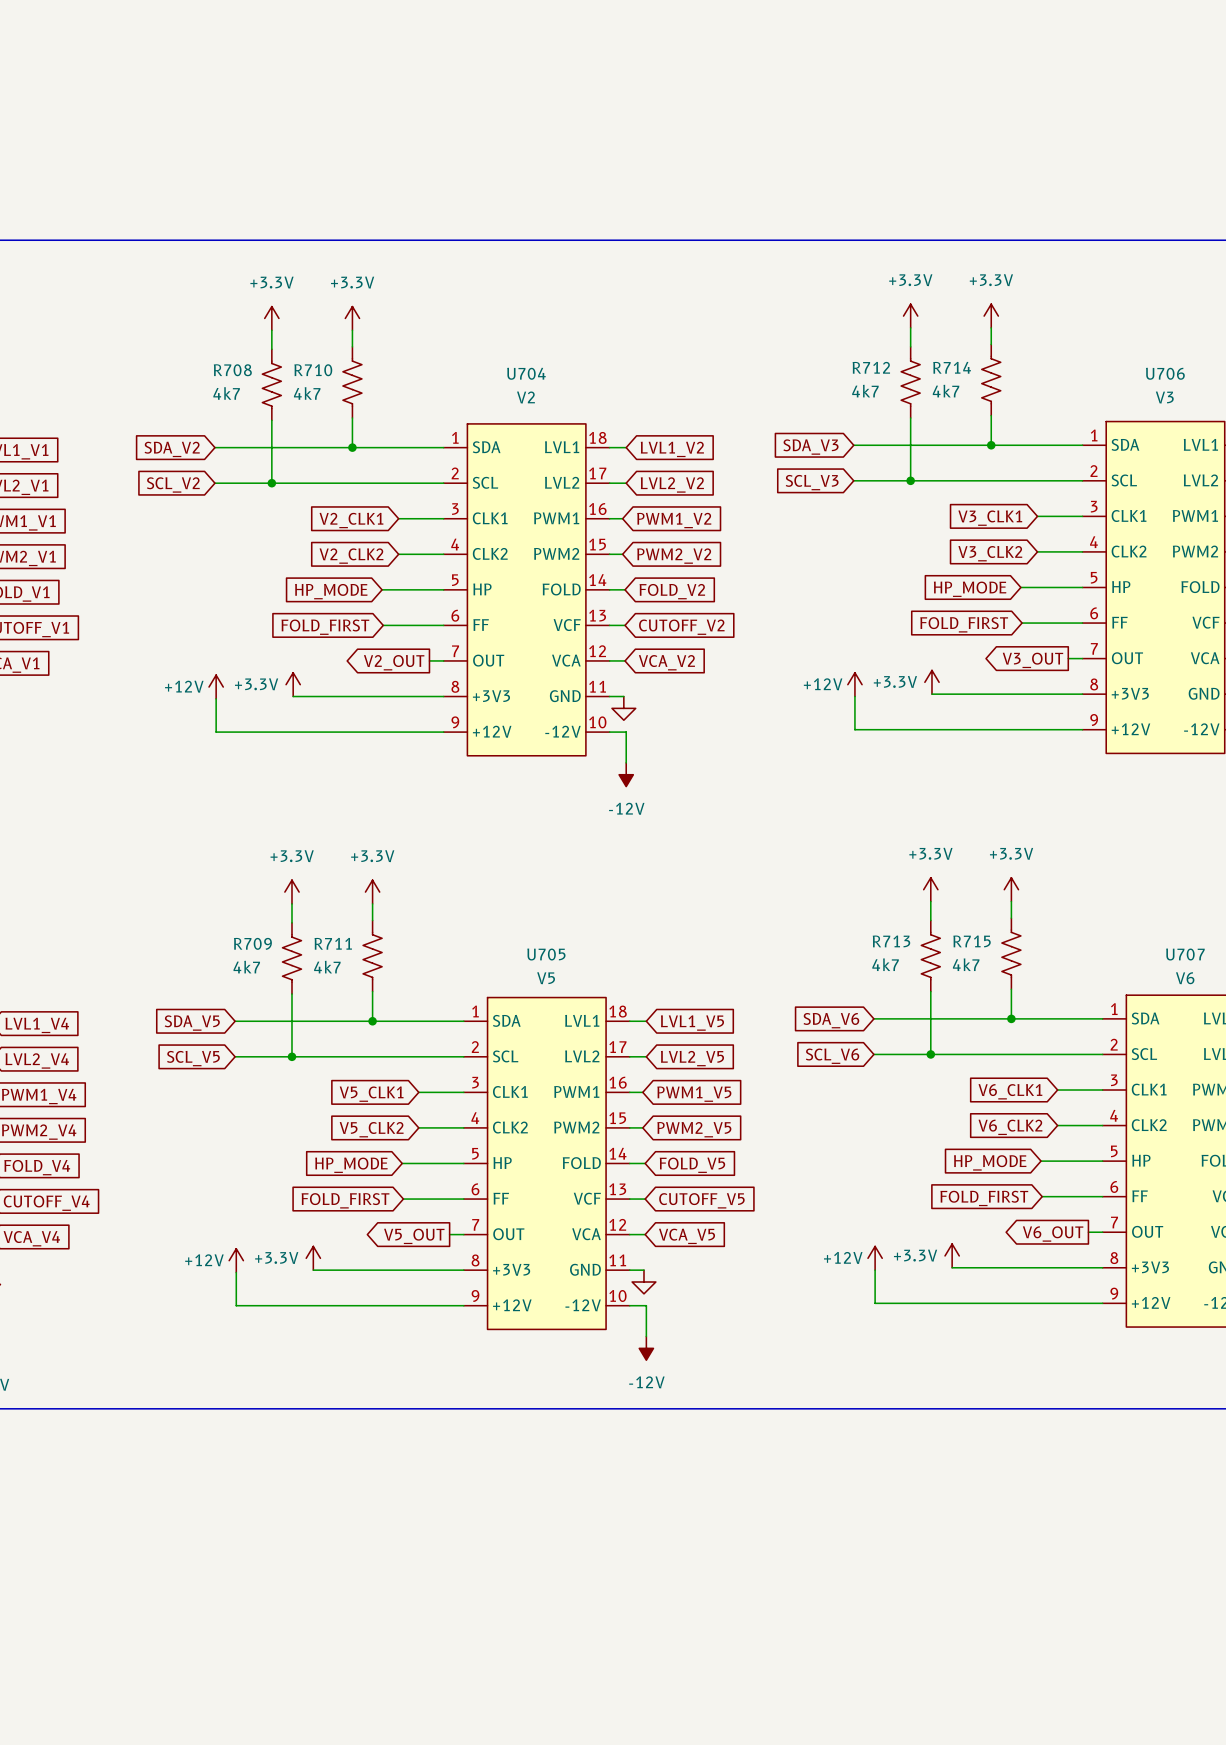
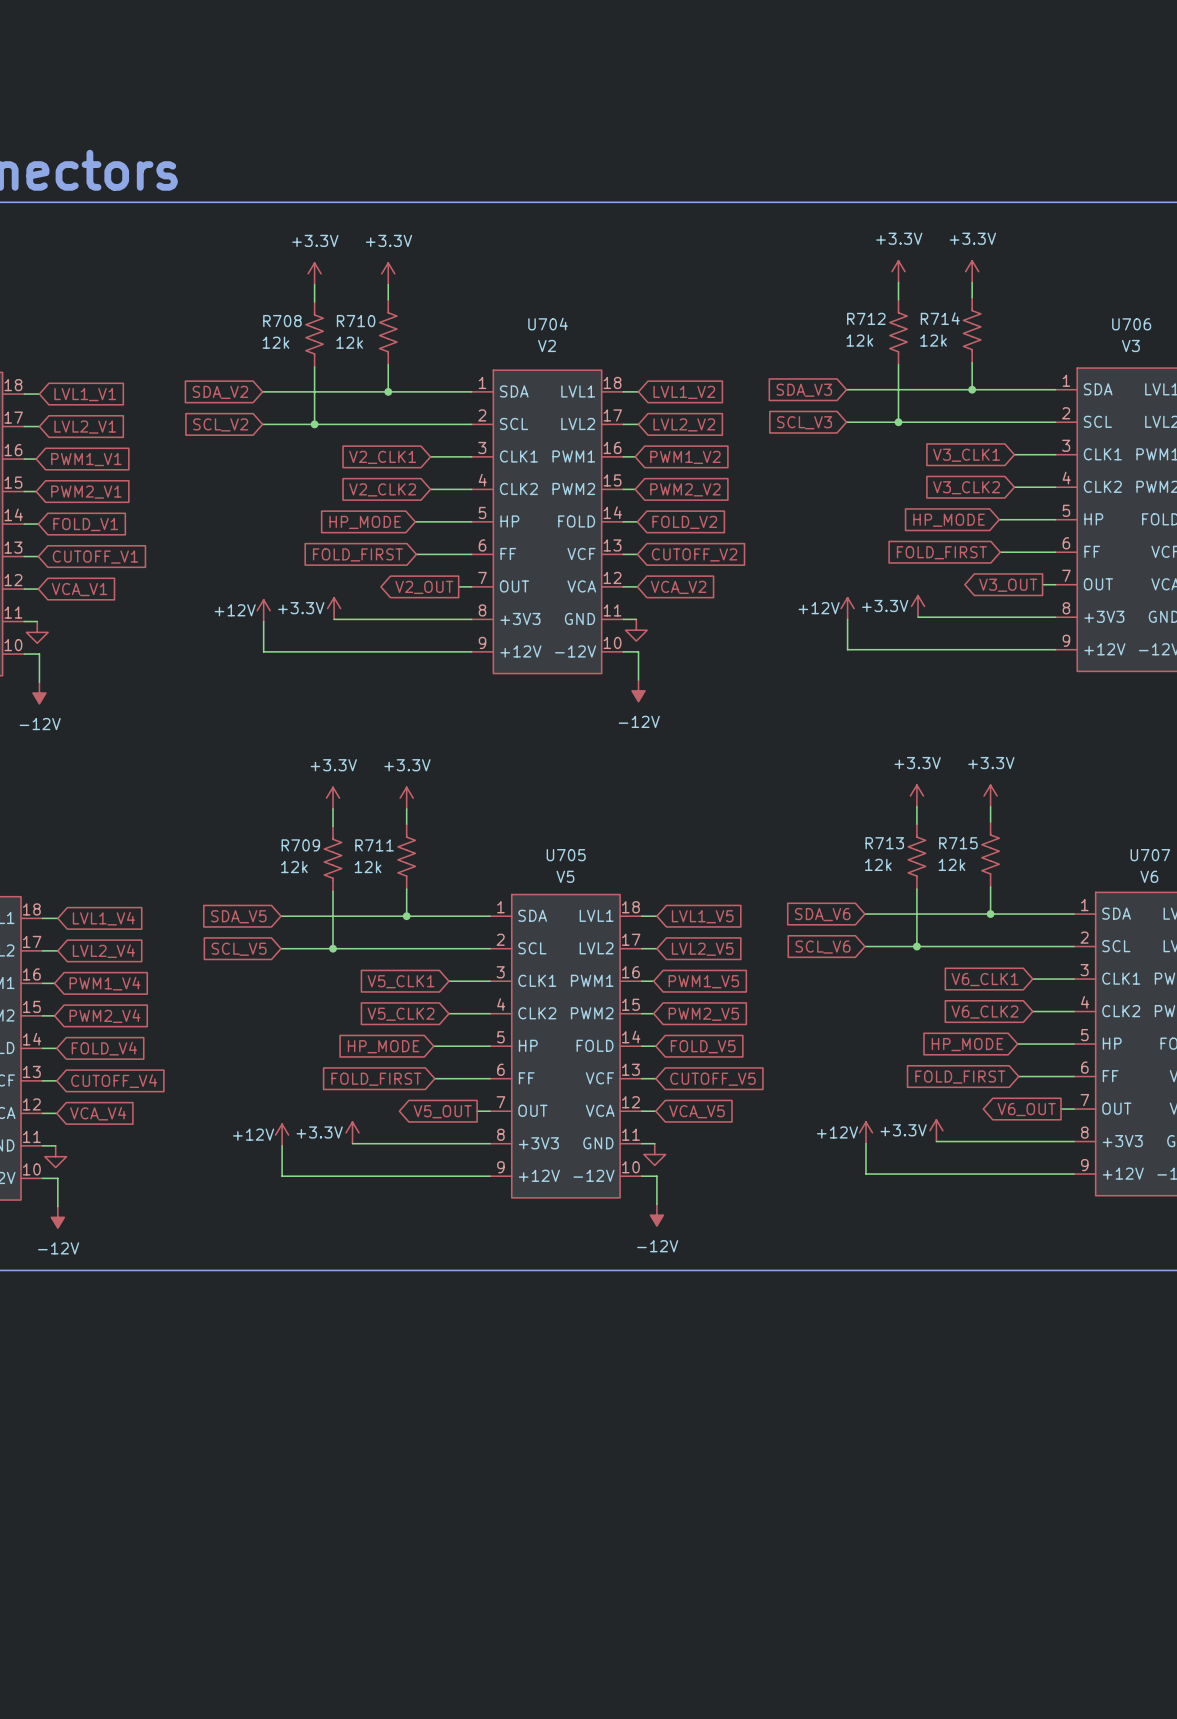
R712 value: 4k7 (865, 391) -> 12k (859, 340)
R714 value: 4k7 (946, 391) -> 12k (933, 340)
R708 value: 4k7 (226, 393) -> 12k (275, 342)
R710 value: 4k7 (307, 393) -> 12k (349, 342)
R713 value: 4k7 (885, 964) -> 12k (878, 864)
R715 value: 4k7 (966, 964) -> 12k (951, 864)
R709 value: 4k7 (246, 967) -> 12k (294, 867)
R711 value: 4k7 (327, 967) -> 12k (368, 867)

